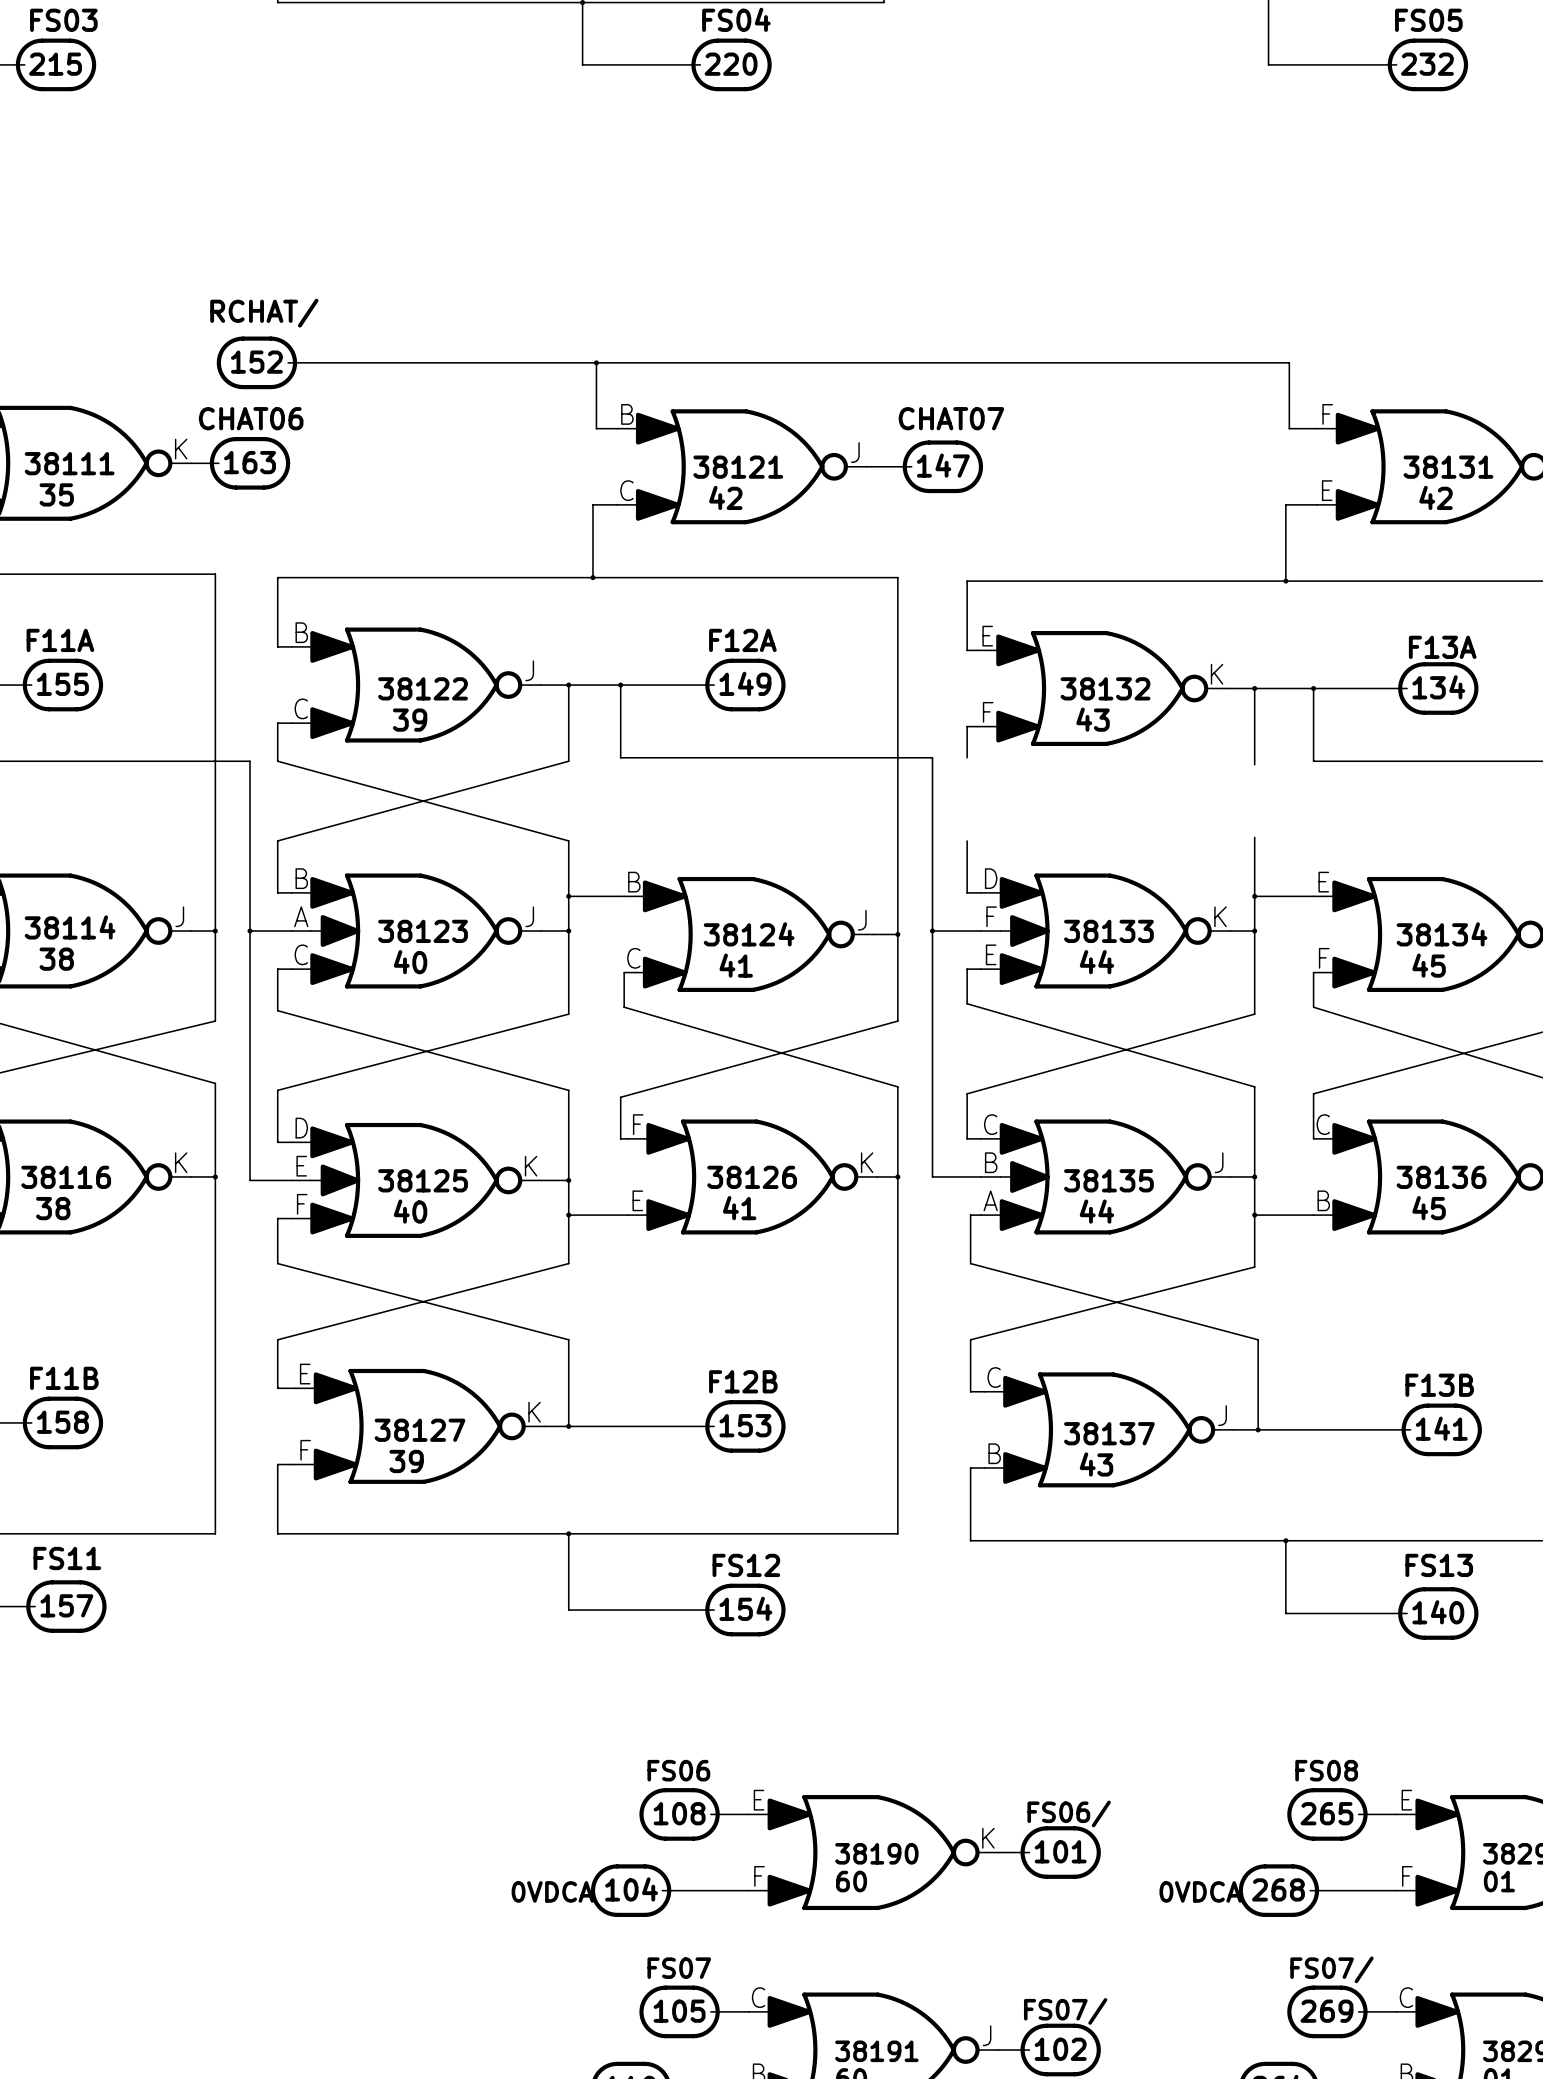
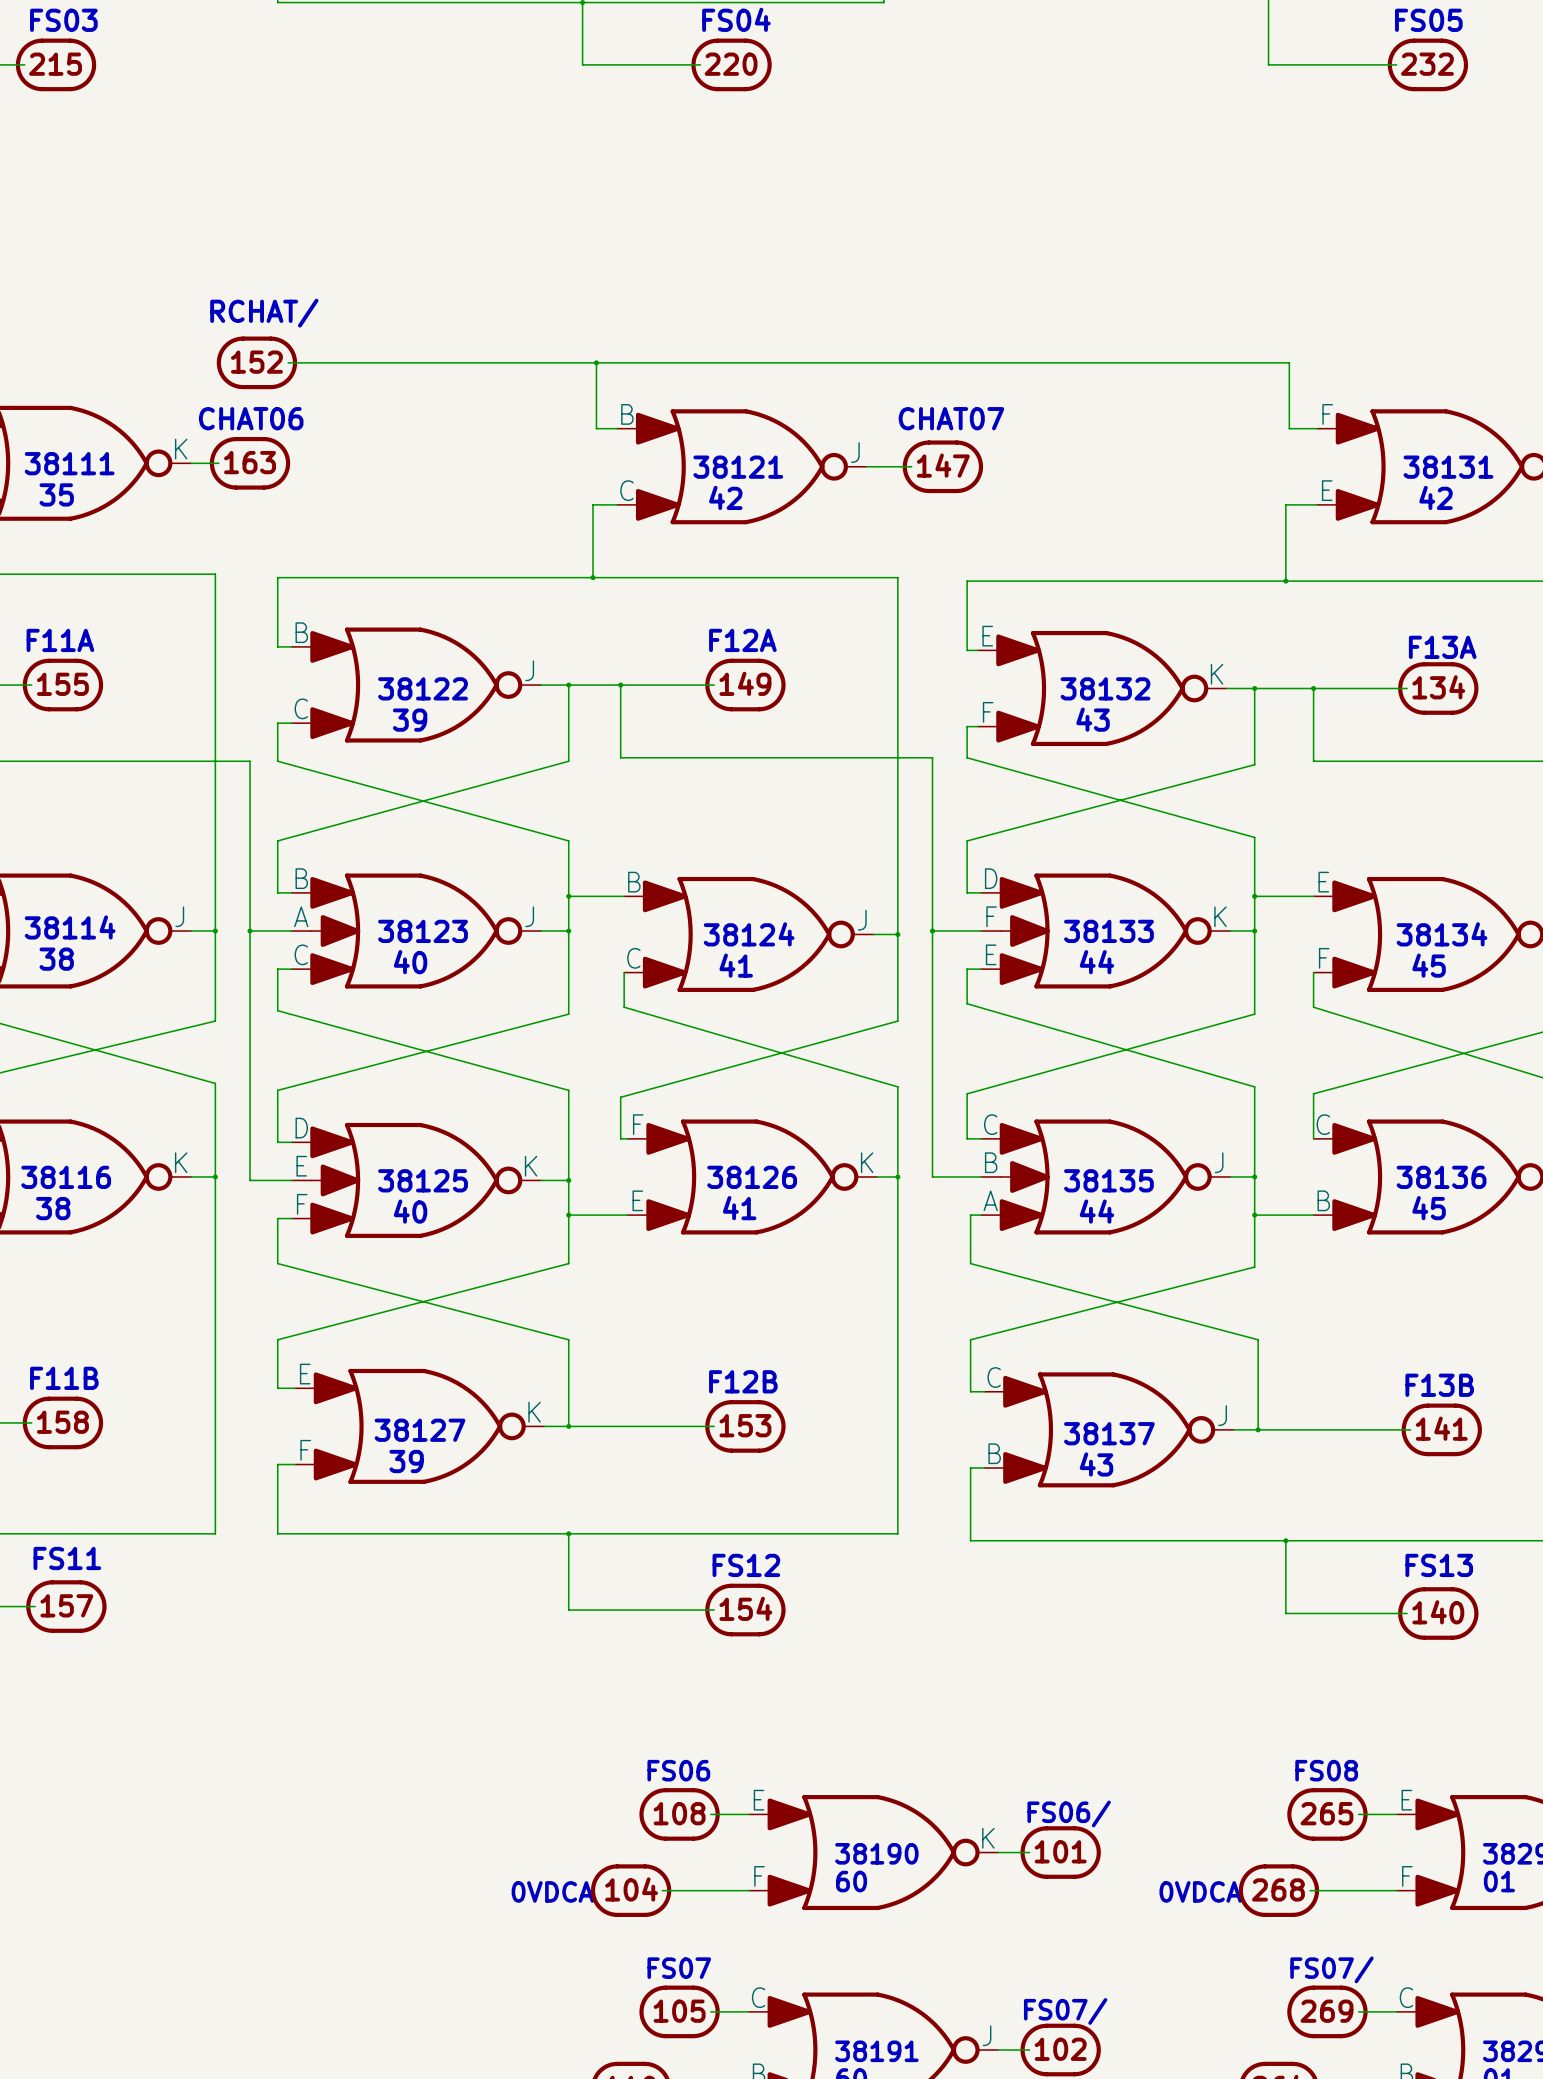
wire: none -> (967, 757) (1254, 837)
wire: none -> (1254, 764) (967, 840)

